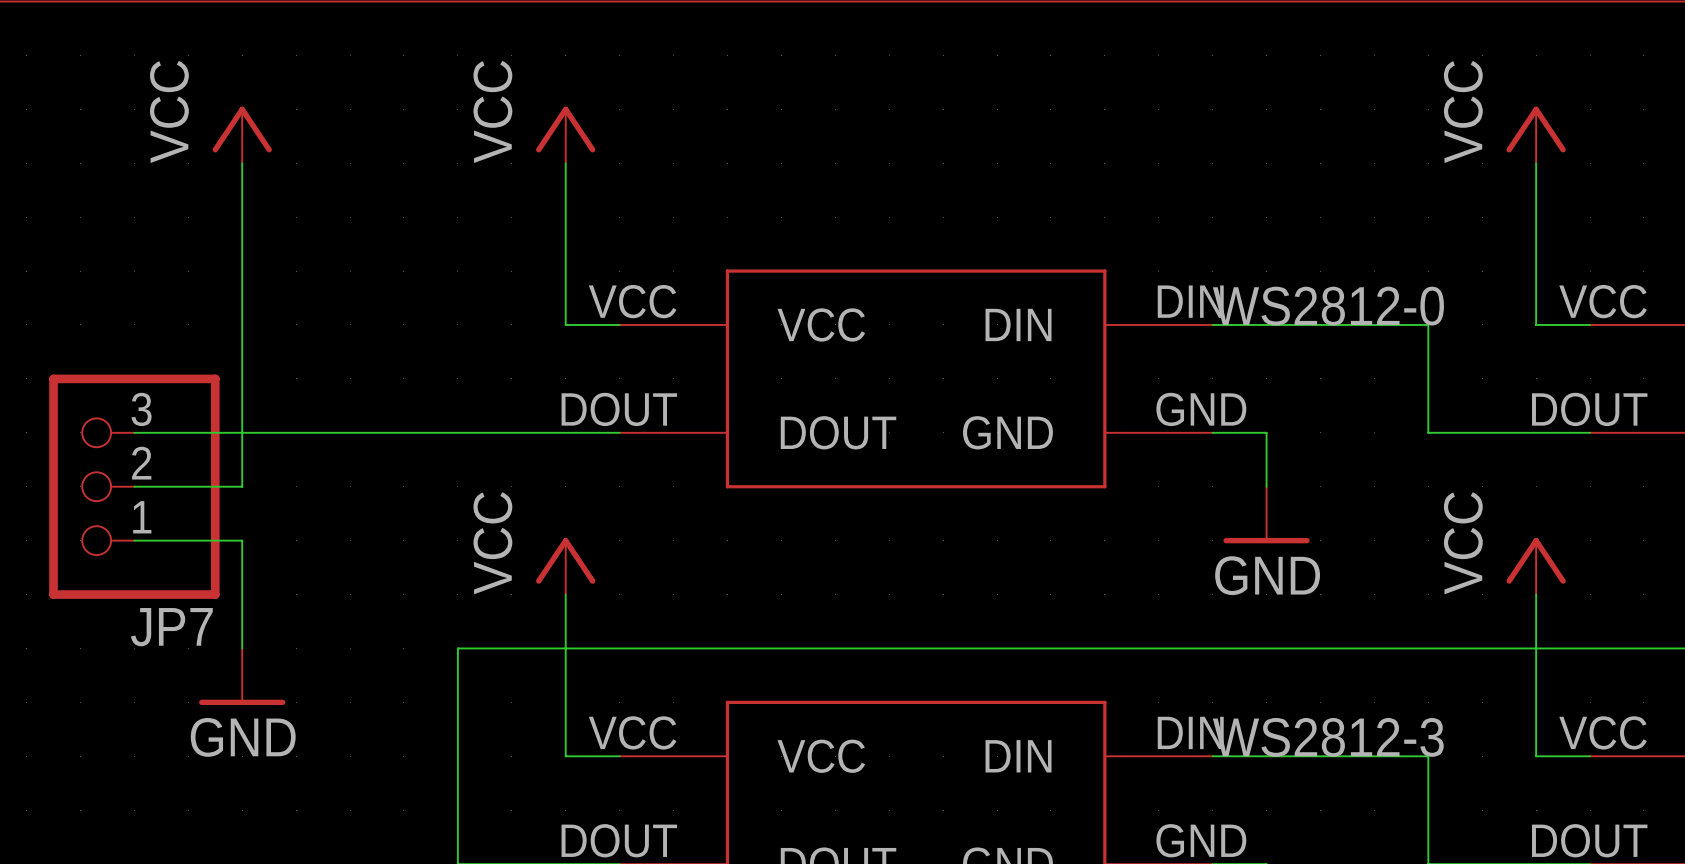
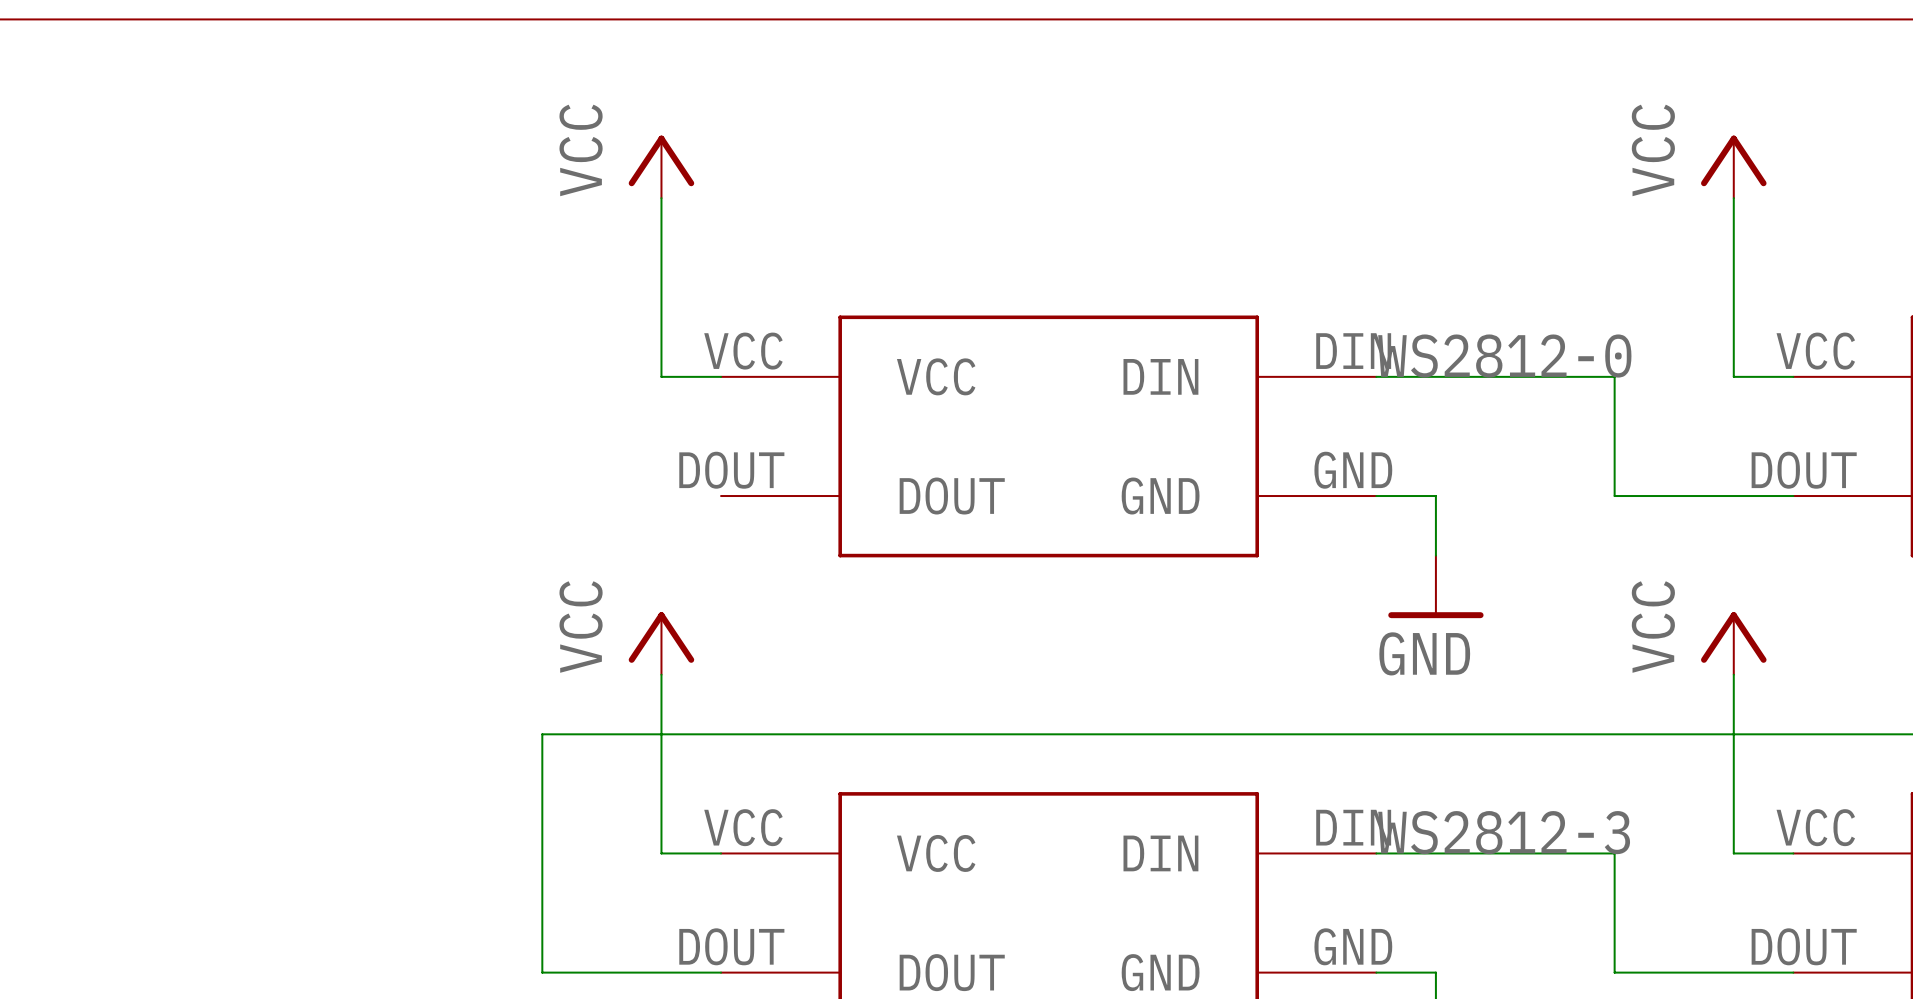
power symbol: VCC (242, 134) -> none
wire: (242, 163) (242, 486) (134, 486) -> none
wire: (134, 432) (619, 432) -> none
JP7: (134, 486) -> none
wire: (134, 540) (242, 540) (242, 648) -> none
power symbol: GND (242, 676) -> none

